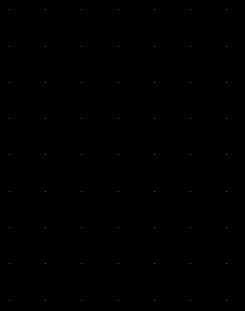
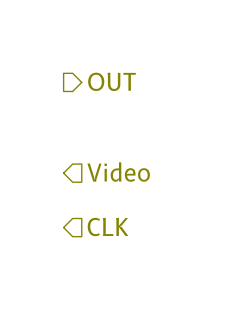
hierarchical label: none -> OUT (111, 81)
hierarchical label: none -> Video (118, 171)
hierarchical label: none -> CLK (108, 227)

